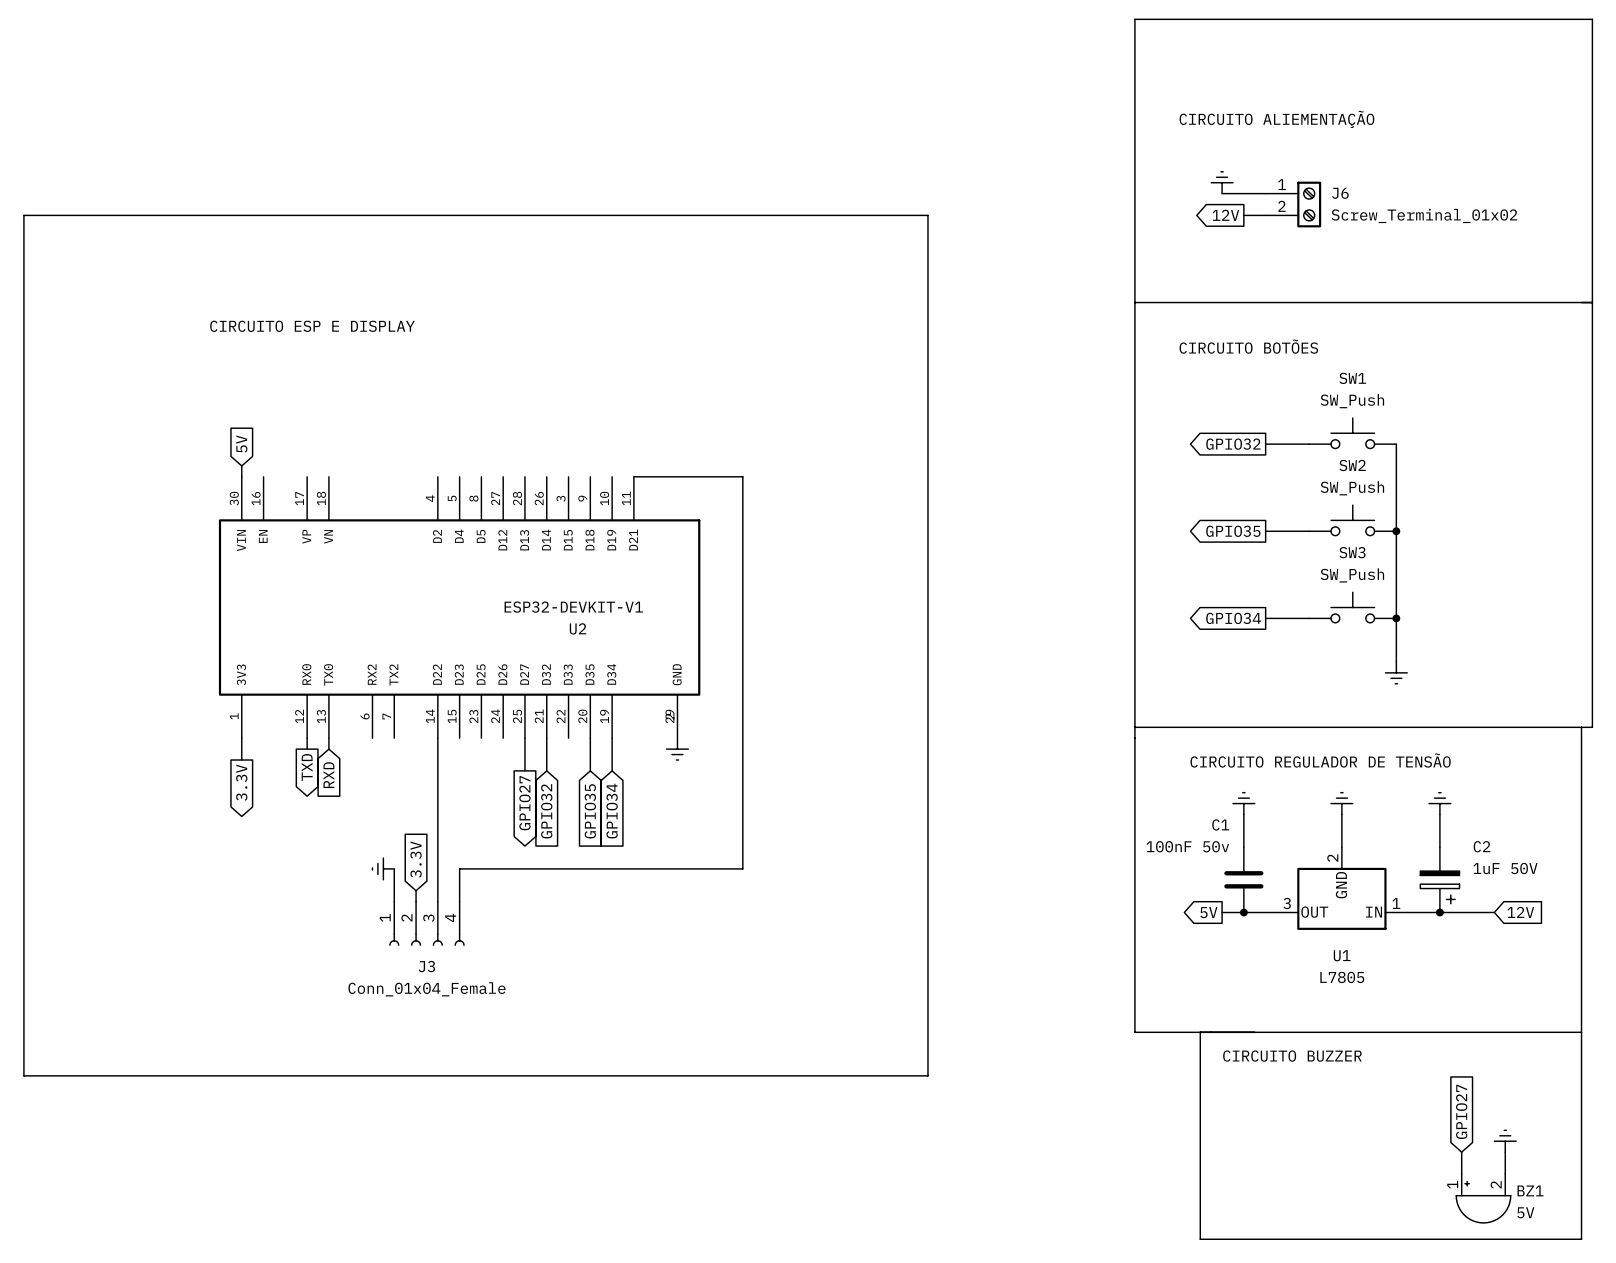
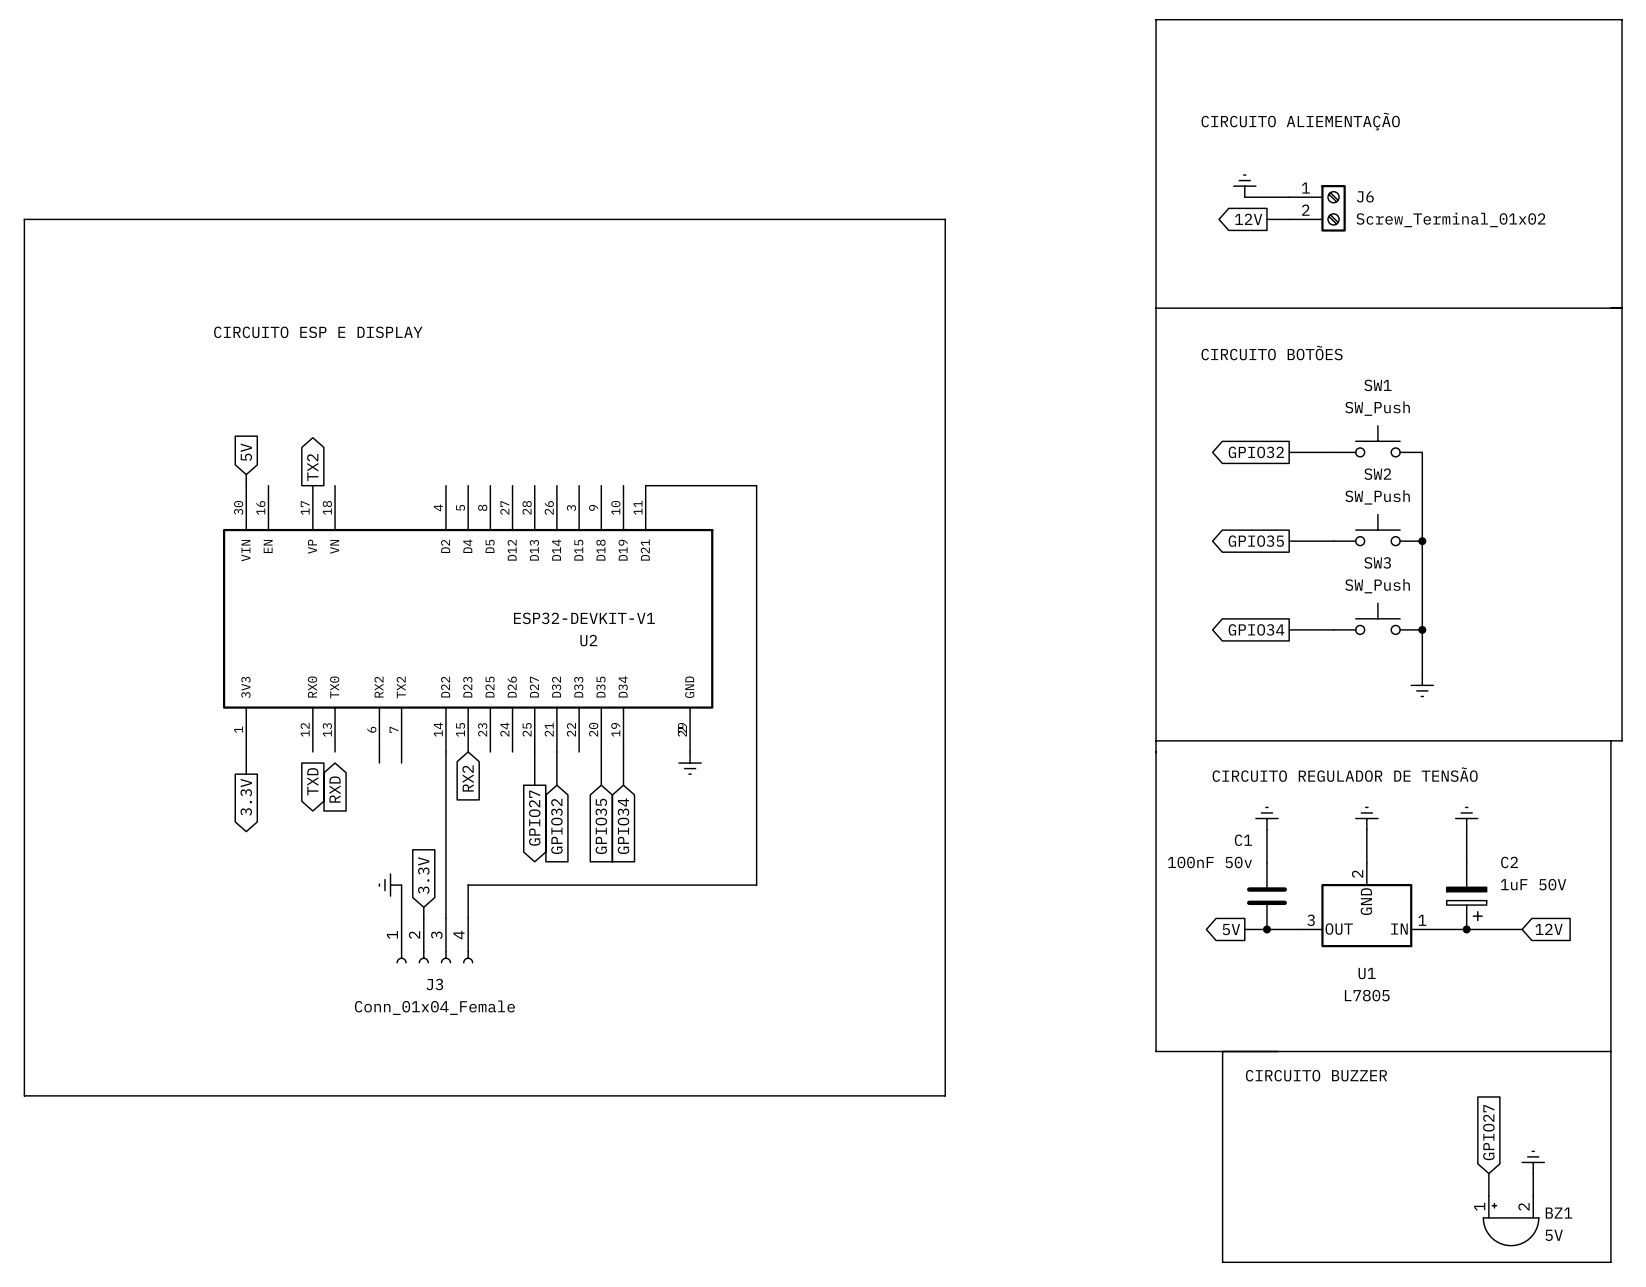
global label: none -> TX2 (312, 467)
wire: (307, 738) (307, 749) -> (379, 751) (379, 763)
wire: (328, 738) (328, 749) -> (401, 751) (401, 763)
global label: none -> RX2 (468, 778)

